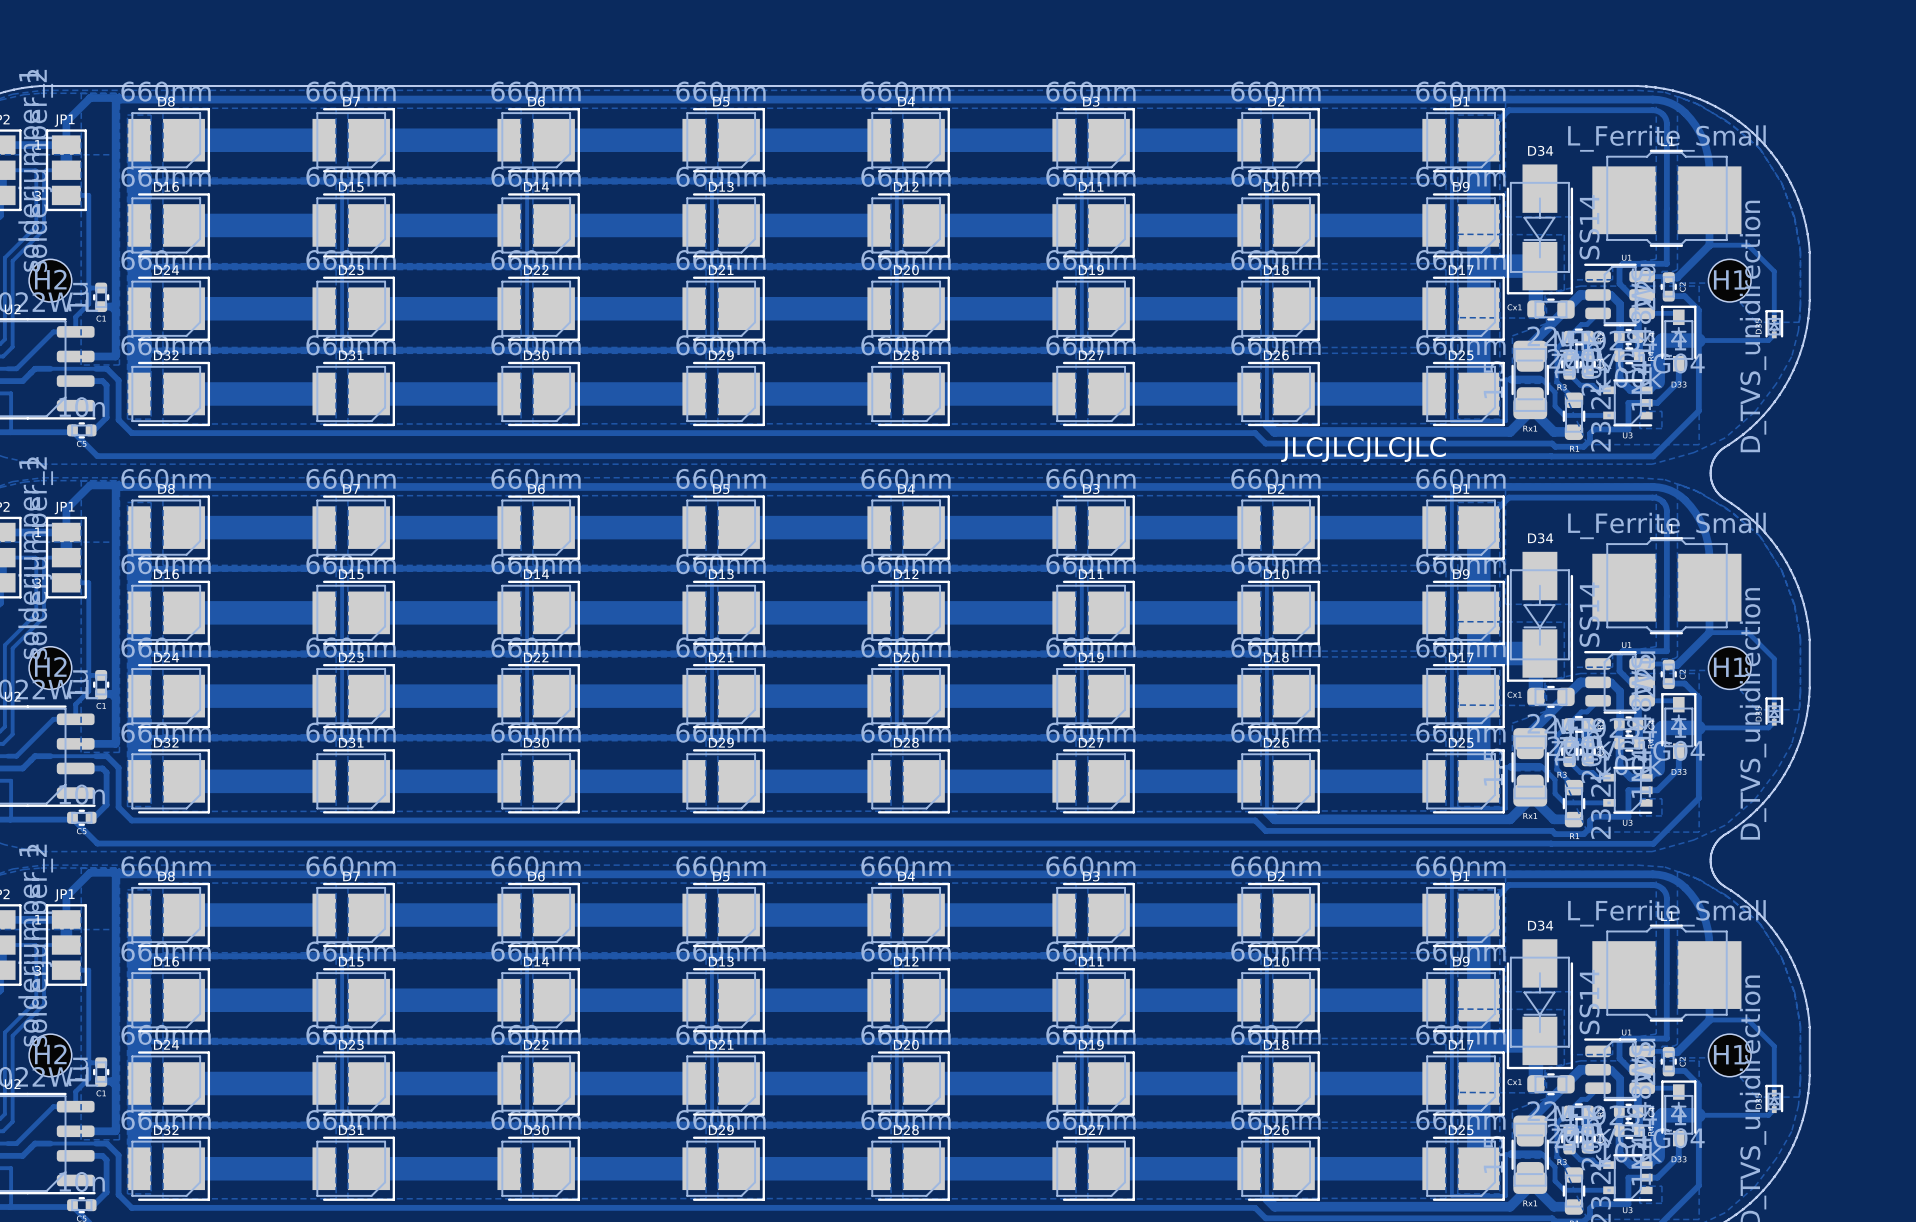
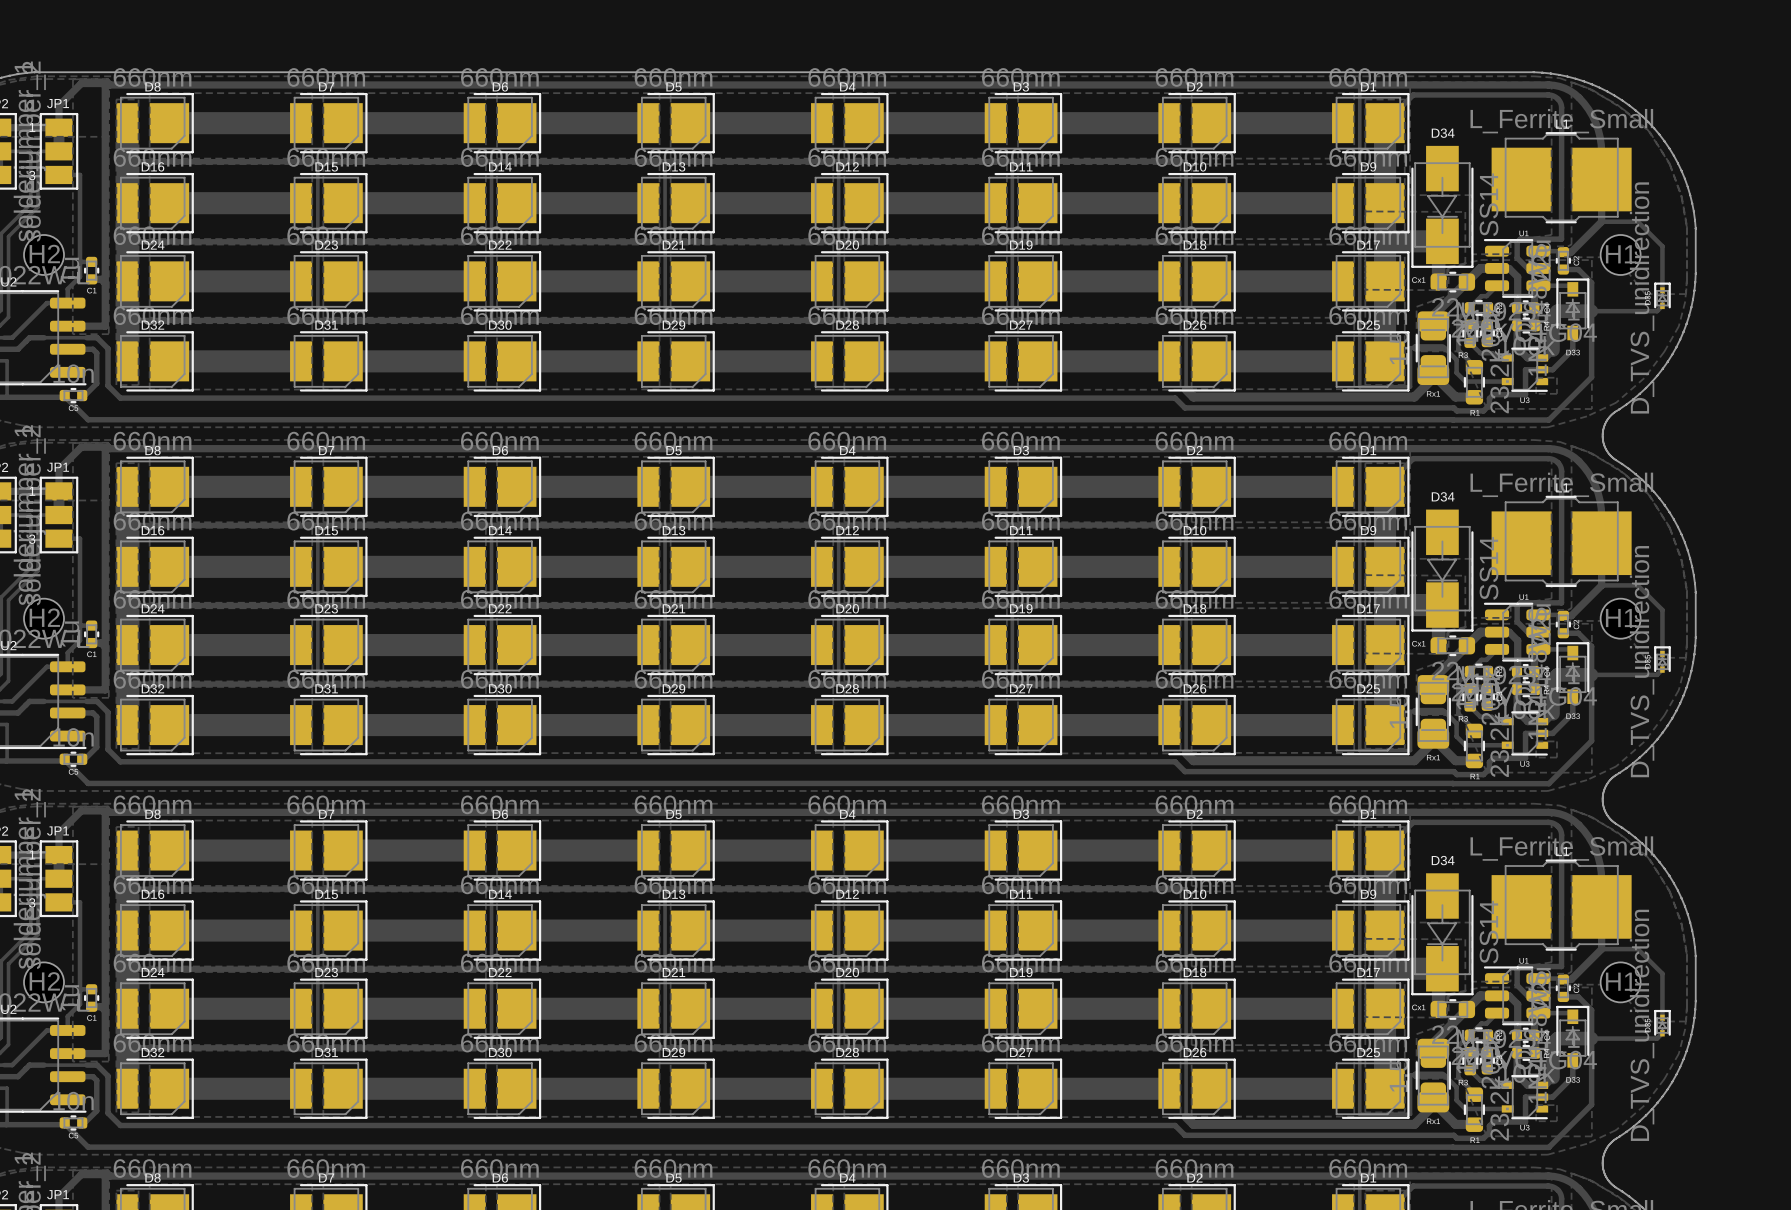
text: JLCJLCJLCJLC (1363, 449) -> none

